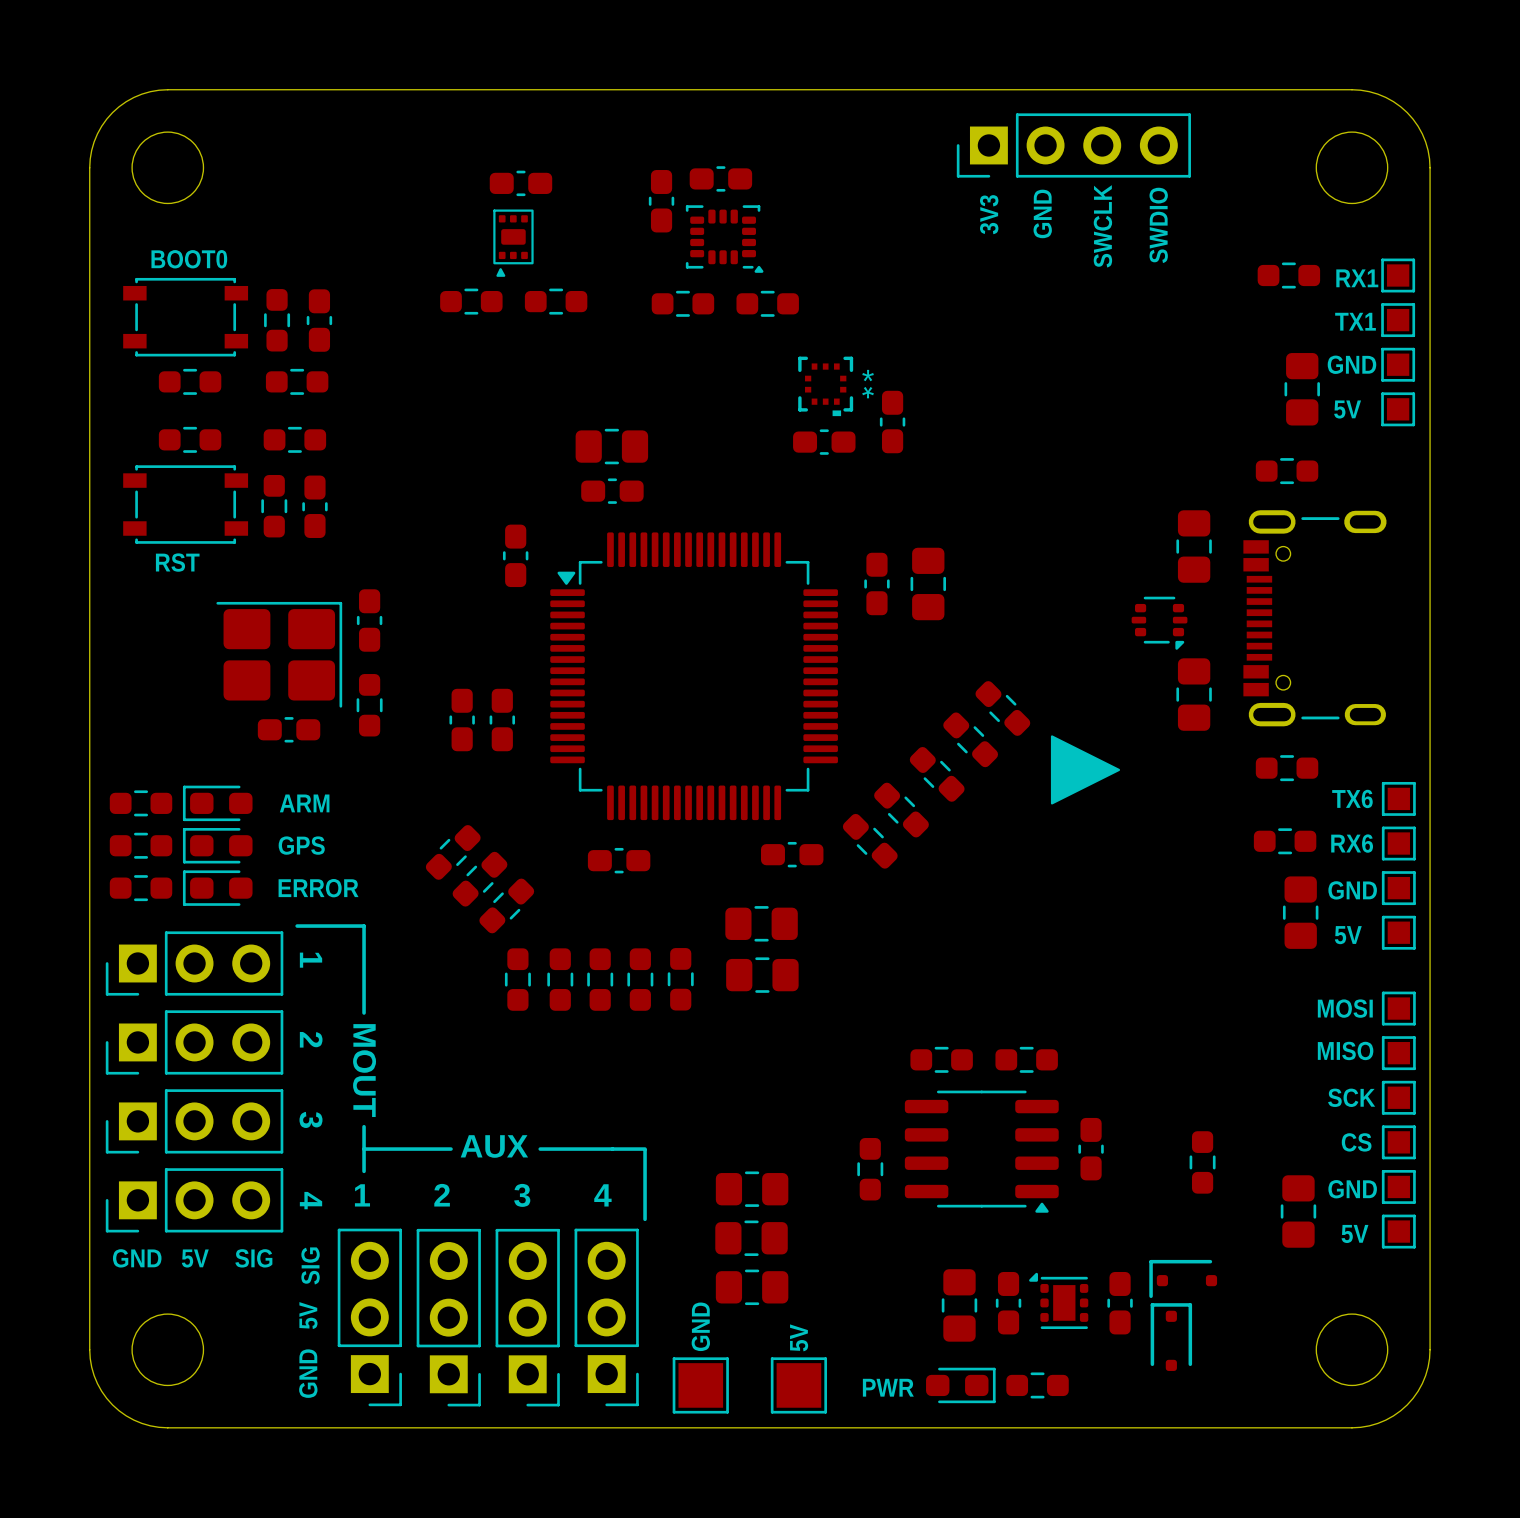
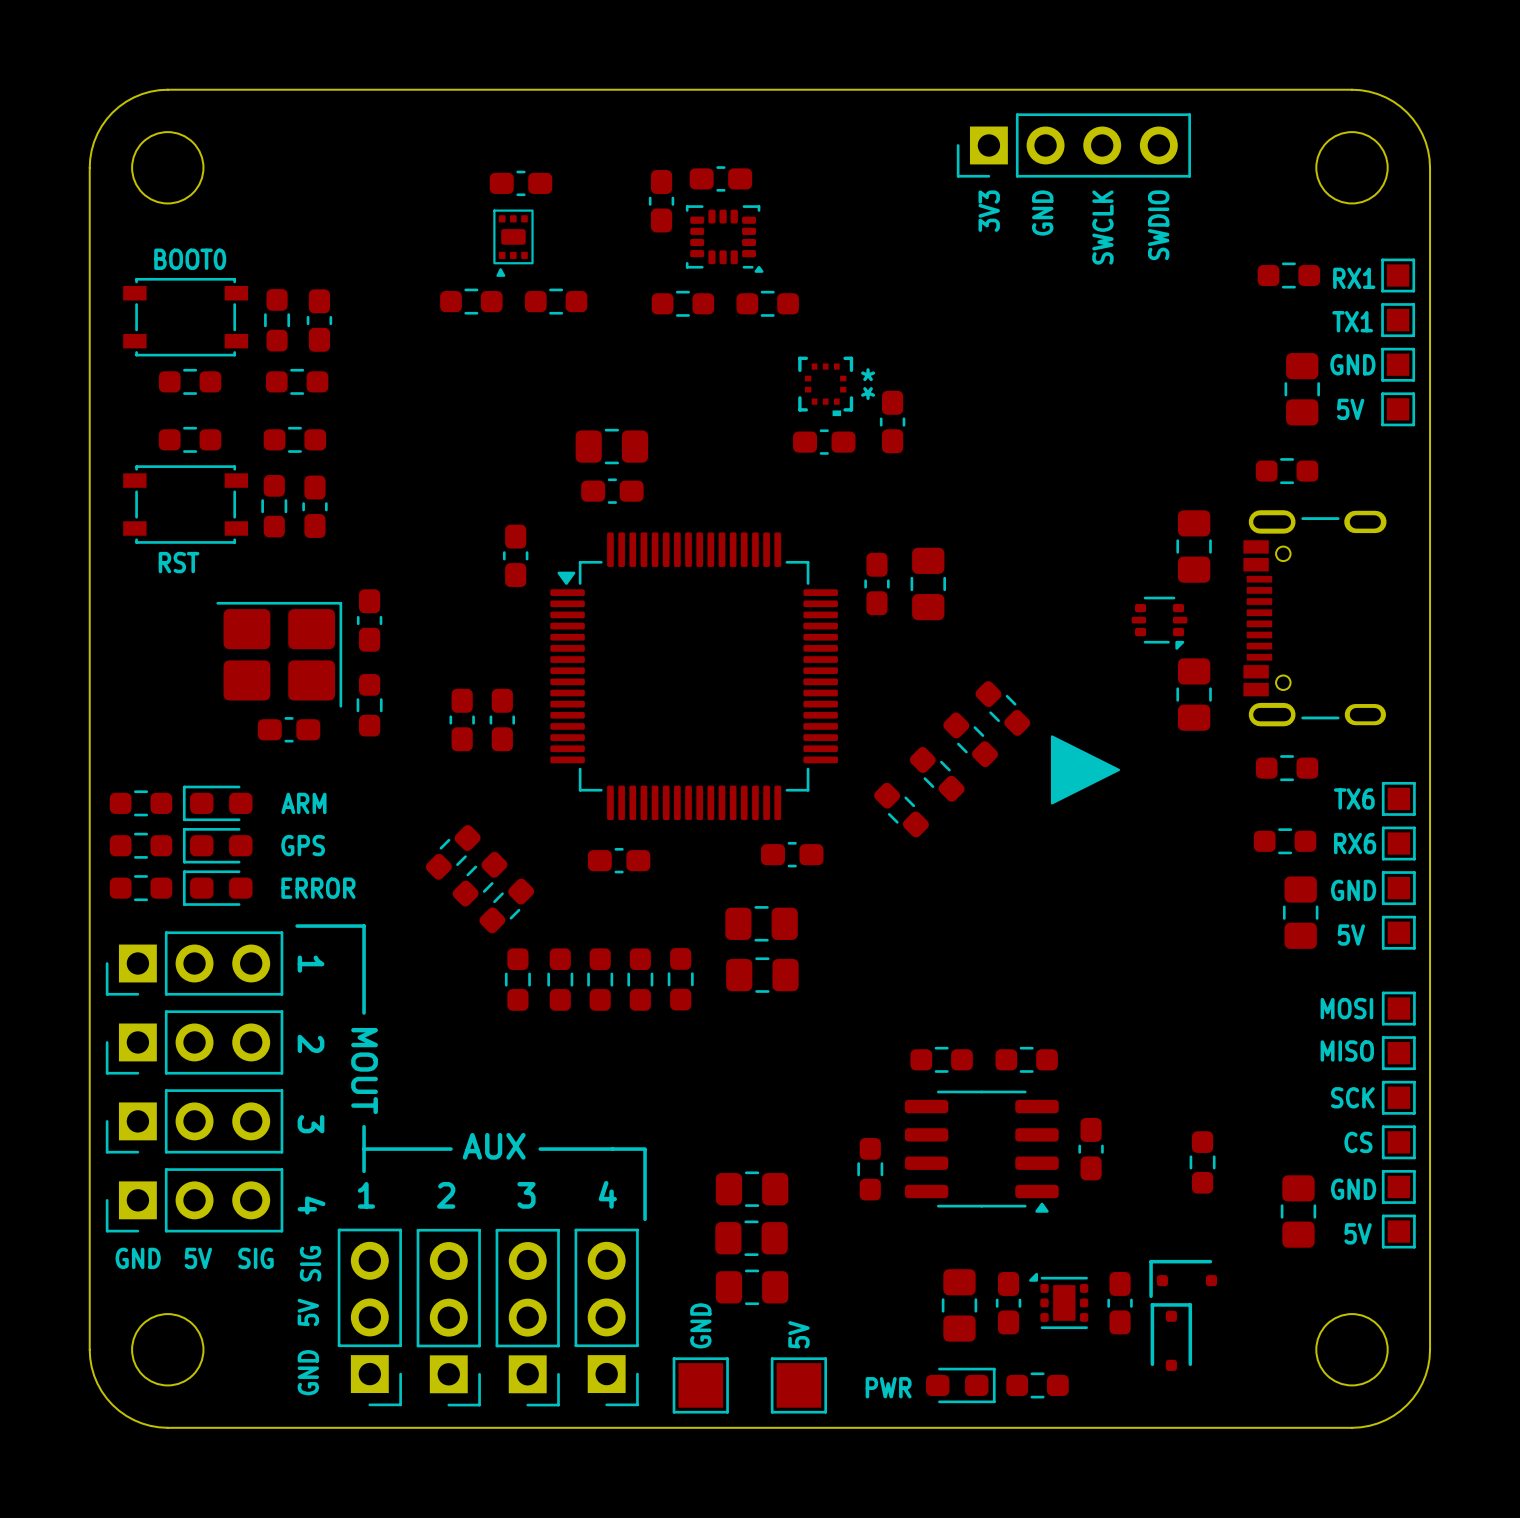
part: (870, 841) -> none

